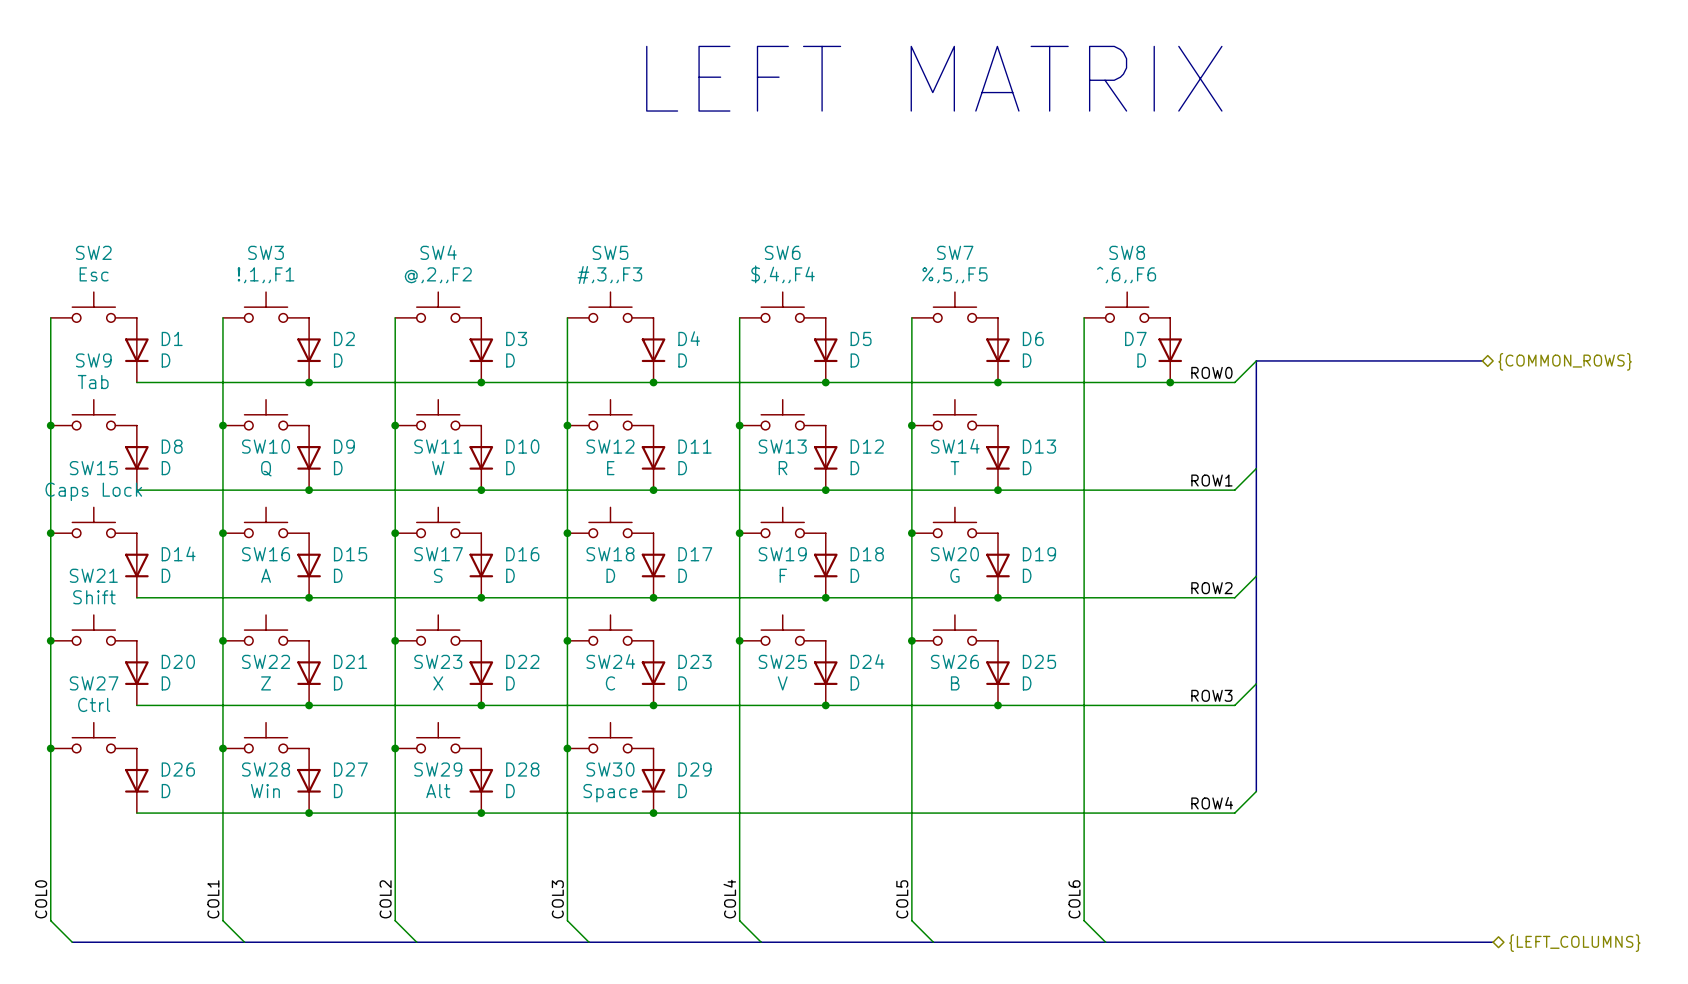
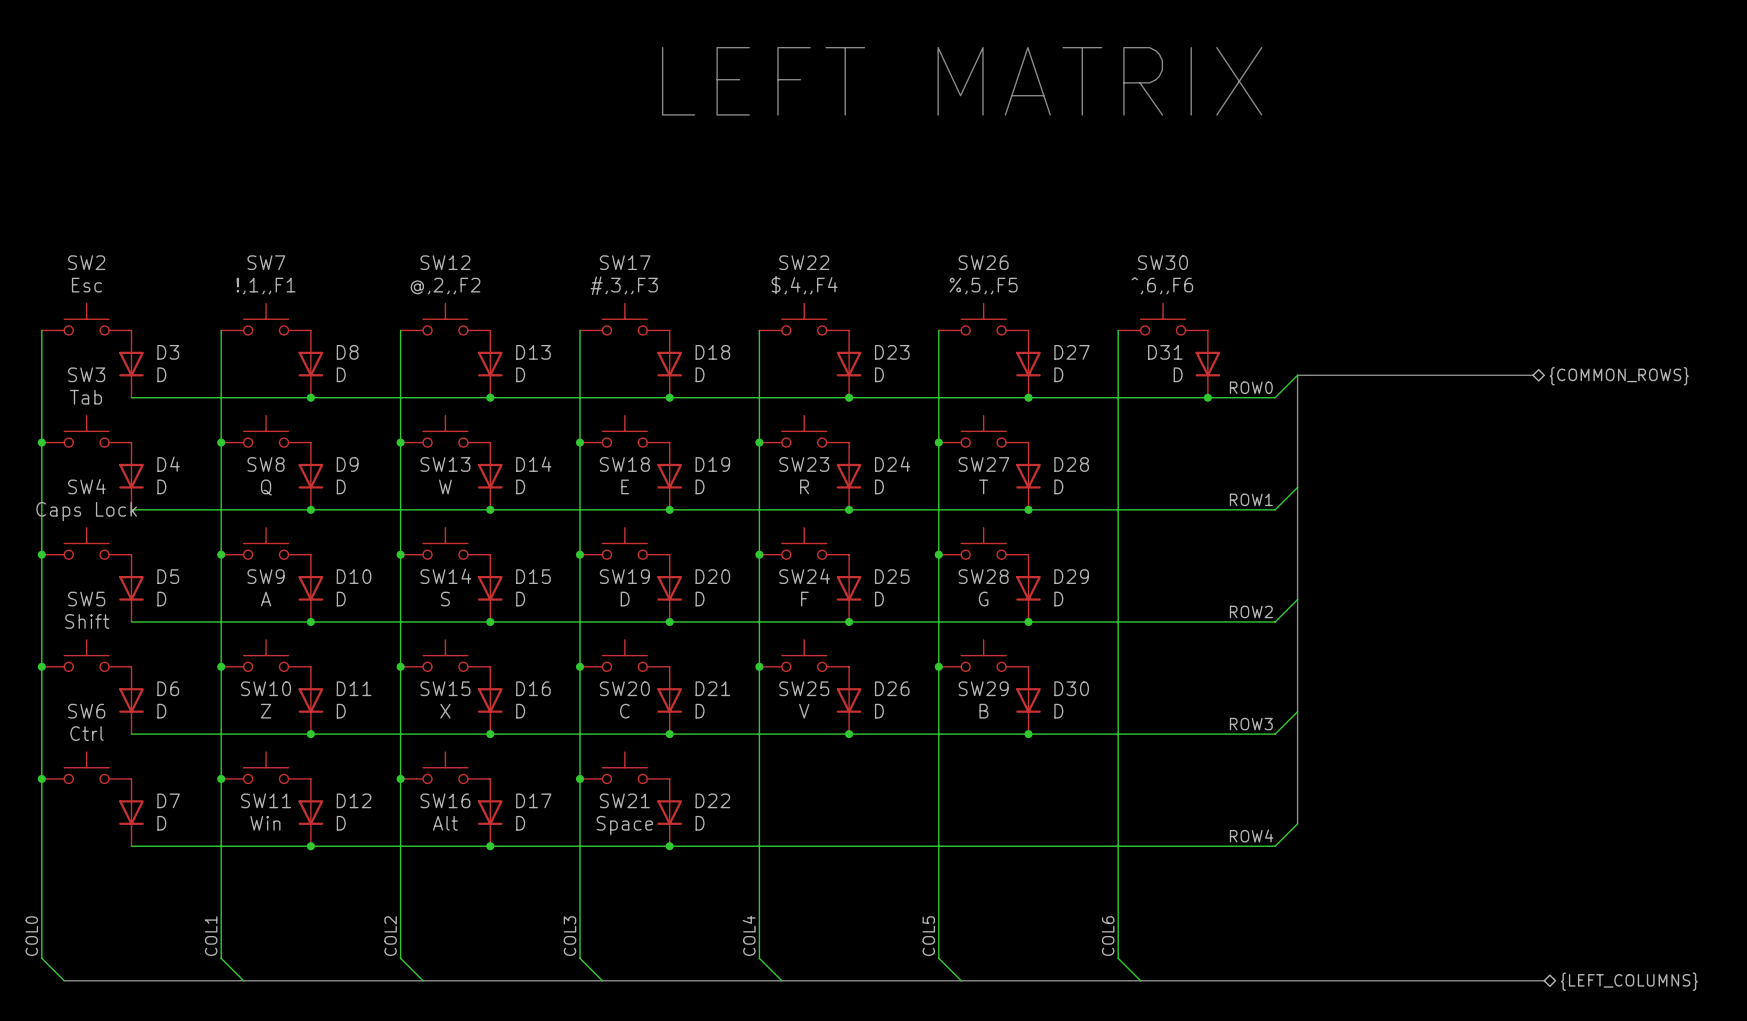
SW3 name: SW3 (266, 252) -> SW7 (266, 262)
SW4 name: SW4 (438, 252) -> SW12 (445, 262)
SW5 name: SW5 (610, 252) -> SW17 (625, 262)
SW6 name: SW6 (782, 252) -> SW22 (804, 262)
SW7 name: SW7 (955, 252) -> SW26 (983, 262)
SW8 name: SW8 (1127, 252) -> SW30 (1163, 262)
D1 name: D1 (172, 338) -> D3 (168, 352)
D2 name: D2 (344, 338) -> D8 (347, 352)
D3 name: D3 (516, 338) -> D13 (533, 352)
D4 name: D4 (689, 338) -> D18 (712, 352)
D5 name: D5 (861, 338) -> D23 (892, 352)
D6 name: D6 (1033, 338) -> D27 (1071, 352)
D7 name: D7 (1135, 338) -> D31 (1165, 352)
SW9 name: SW9 (93, 360) -> SW3 (86, 374)
D8 name: D8 (172, 446) -> D4 (168, 464)
SW10 name: SW10 (266, 446) -> SW8 (266, 464)
SW11 name: SW11 (438, 446) -> SW13 (445, 464)
D10 name: D10 (522, 446) -> D14 (533, 464)
SW12 name: SW12 (610, 446) -> SW18 (624, 464)
D11 name: D11 (694, 446) -> D19 (712, 464)
SW13 name: SW13 (782, 446) -> SW23 (804, 464)
D12 name: D12 (867, 446) -> D24 (892, 464)
SW14 name: SW14 (955, 446) -> SW27 (983, 464)
D13 name: D13 (1039, 446) -> D28 (1071, 464)
SW15 name: SW15 (93, 468) -> SW4 (86, 486)
D14 name: D14 (178, 553) -> D5 (168, 576)
SW16 name: SW16 (266, 554) -> SW9 (266, 576)
D15 name: D15 (350, 554) -> D10 (354, 576)
SW17 name: SW17 (438, 554) -> SW14 (445, 576)
D16 name: D16 (522, 554) -> D15 (533, 576)
SW18 name: SW18 (610, 554) -> SW19 (624, 576)
D17 name: D17 (695, 554) -> D20 (712, 576)
SW19 name: SW19 (782, 554) -> SW24 (804, 576)
D18 name: D18 (867, 554) -> D25 (892, 576)
SW20 name: SW20 (954, 554) -> SW28 (983, 576)
D19 name: D19 (1039, 554) -> D29 (1071, 576)
SW21 name: SW21 (93, 575) -> SW5 (86, 599)
D20 name: D20 (178, 661) -> D6 (168, 688)
SW22 name: SW22 (266, 661) -> SW10 (266, 688)
D21 name: D21 (350, 661) -> D11 (354, 688)
SW23 name: SW23 (438, 661) -> SW15 (445, 688)
D22 name: D22 (522, 661) -> D16 (533, 688)
SW24 name: SW24 (610, 661) -> SW20 (624, 688)
D23 name: D23 (694, 661) -> D21 (712, 688)
D24 name: D24 (867, 661) -> D26 (892, 688)
SW26 name: SW26 (954, 661) -> SW29 (983, 688)
D25 name: D25 (1039, 661) -> D30 (1071, 688)
SW27 name: SW27 (94, 683) -> SW6 (86, 711)
D26 name: D26 (178, 769) -> D7 (168, 800)
SW28 name: SW28 (266, 769) -> SW11 (266, 800)
D27 name: D27 (350, 769) -> D12 (354, 800)
SW29 name: SW29 (438, 769) -> SW16 (445, 800)
D28 name: D28 (522, 769) -> D17 (533, 800)
SW30 name: SW30 (610, 769) -> SW21 (624, 800)
D29 name: D29 (694, 769) -> D22 (712, 800)

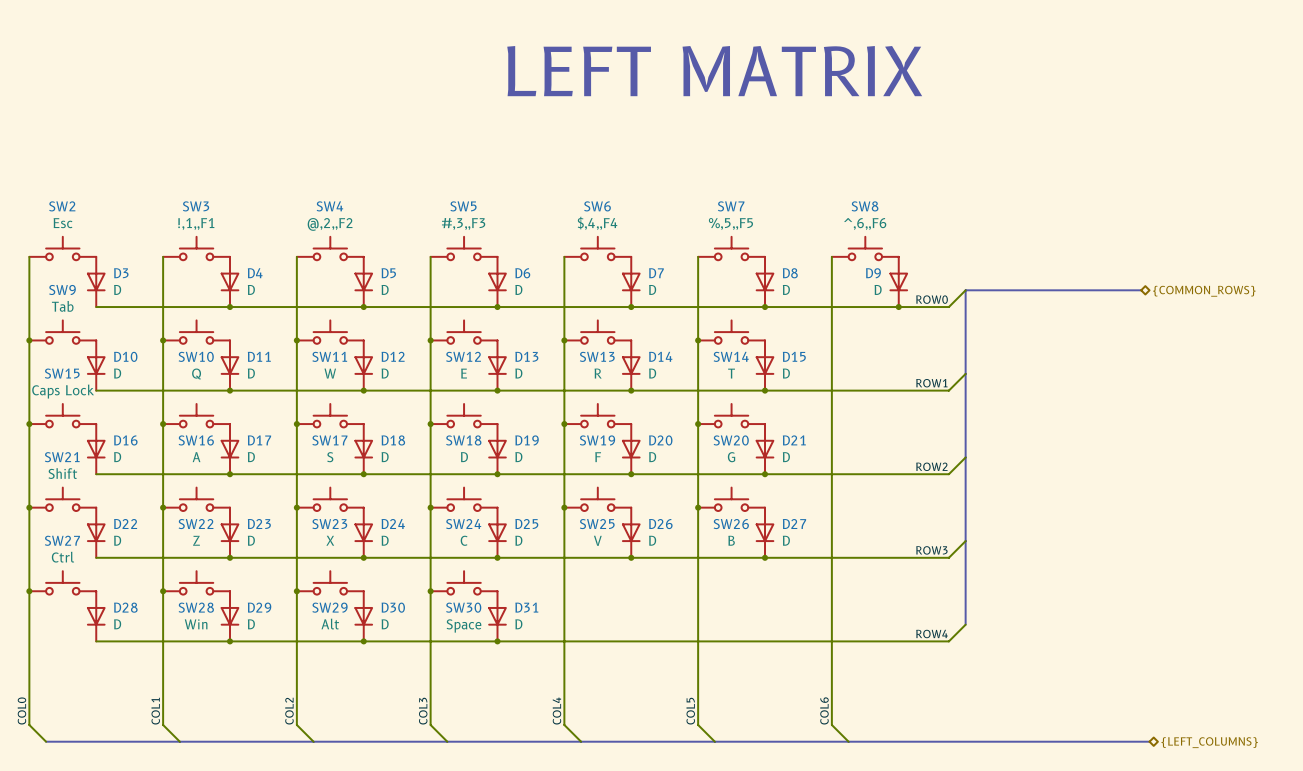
SW7 name: SW7 (266, 262) -> SW3 (196, 206)
SW12 name: SW12 (445, 262) -> SW4 (329, 206)
SW17 name: SW17 (625, 262) -> SW5 (463, 206)
SW22 name: SW22 (804, 262) -> SW6 (597, 206)
SW26 name: SW26 (983, 262) -> SW7 (731, 206)
SW30 name: SW30 (1163, 262) -> SW8 (865, 206)
D8 name: D8 (347, 352) -> D4 (255, 273)
D13 name: D13 (533, 352) -> D5 (388, 273)
D18 name: D18 (712, 352) -> D6 (522, 273)
D23 name: D23 (892, 352) -> D7 (656, 273)
D27 name: D27 (1071, 352) -> D8 (790, 273)
D31 name: D31 (1165, 352) -> D9 (873, 273)
SW3 name: SW3 (86, 374) -> SW9 (62, 289)
D4 name: D4 (168, 464) -> D10 (125, 356)
SW8 name: SW8 (266, 464) -> SW10 (196, 356)
D9 name: D9 (347, 464) -> D11 (259, 356)
SW13 name: SW13 (445, 464) -> SW11 (329, 356)
D14 name: D14 (533, 464) -> D12 (393, 356)
SW18 name: SW18 (624, 464) -> SW12 (463, 356)
D19 name: D19 (712, 464) -> D13 (526, 356)
SW23 name: SW23 (804, 464) -> SW13 (597, 356)
D24 name: D24 (892, 464) -> D14 (660, 356)
SW27 name: SW27 (983, 464) -> SW14 (731, 356)
D28 name: D28 (1071, 464) -> D15 (794, 356)
SW4 name: SW4 (86, 486) -> SW15 (62, 373)
D5 name: D5 (168, 576) -> D16 (125, 440)
SW9 name: SW9 (266, 576) -> SW16 (196, 440)
D10 name: D10 (354, 576) -> D17 (259, 440)
SW14 name: SW14 (445, 576) -> SW17 (329, 440)
D15 name: D15 (533, 576) -> D18 (393, 440)
SW19 name: SW19 (624, 576) -> SW18 (463, 440)
D20 name: D20 (712, 576) -> D19 (527, 440)
SW24 name: SW24 (804, 576) -> SW19 (597, 440)
D25 name: D25 (892, 576) -> D20 (660, 440)
SW28 name: SW28 (983, 576) -> SW20 (731, 440)
D29 name: D29 (1071, 576) -> D21 (794, 440)
SW5 name: SW5 (86, 599) -> SW21 (62, 457)
D6 name: D6 (168, 688) -> D22 (125, 524)
SW10 name: SW10 (266, 688) -> SW22 (196, 524)
D11 name: D11 (354, 688) -> D23 (259, 524)
SW15 name: SW15 (445, 688) -> SW23 (329, 524)
D16 name: D16 (533, 688) -> D24 (393, 523)
SW20 name: SW20 (624, 688) -> SW24 (463, 524)
D21 name: D21 (712, 688) -> D25 (526, 524)
SW29 name: SW29 (983, 688) -> SW26 (731, 524)
D30 name: D30 (1071, 688) -> D27 (794, 524)
SW6 name: SW6 (86, 711) -> SW27 (62, 540)
D7 name: D7 (168, 800) -> D28 (125, 607)
SW11 name: SW11 (266, 800) -> SW28 (196, 607)
D12 name: D12 (354, 800) -> D29 (259, 607)
SW16 name: SW16 (445, 800) -> SW29 (329, 607)
D17 name: D17 (533, 800) -> D30 (393, 607)
SW21 name: SW21 (624, 800) -> SW30 (463, 607)
D22 name: D22 (712, 800) -> D31 (526, 607)

